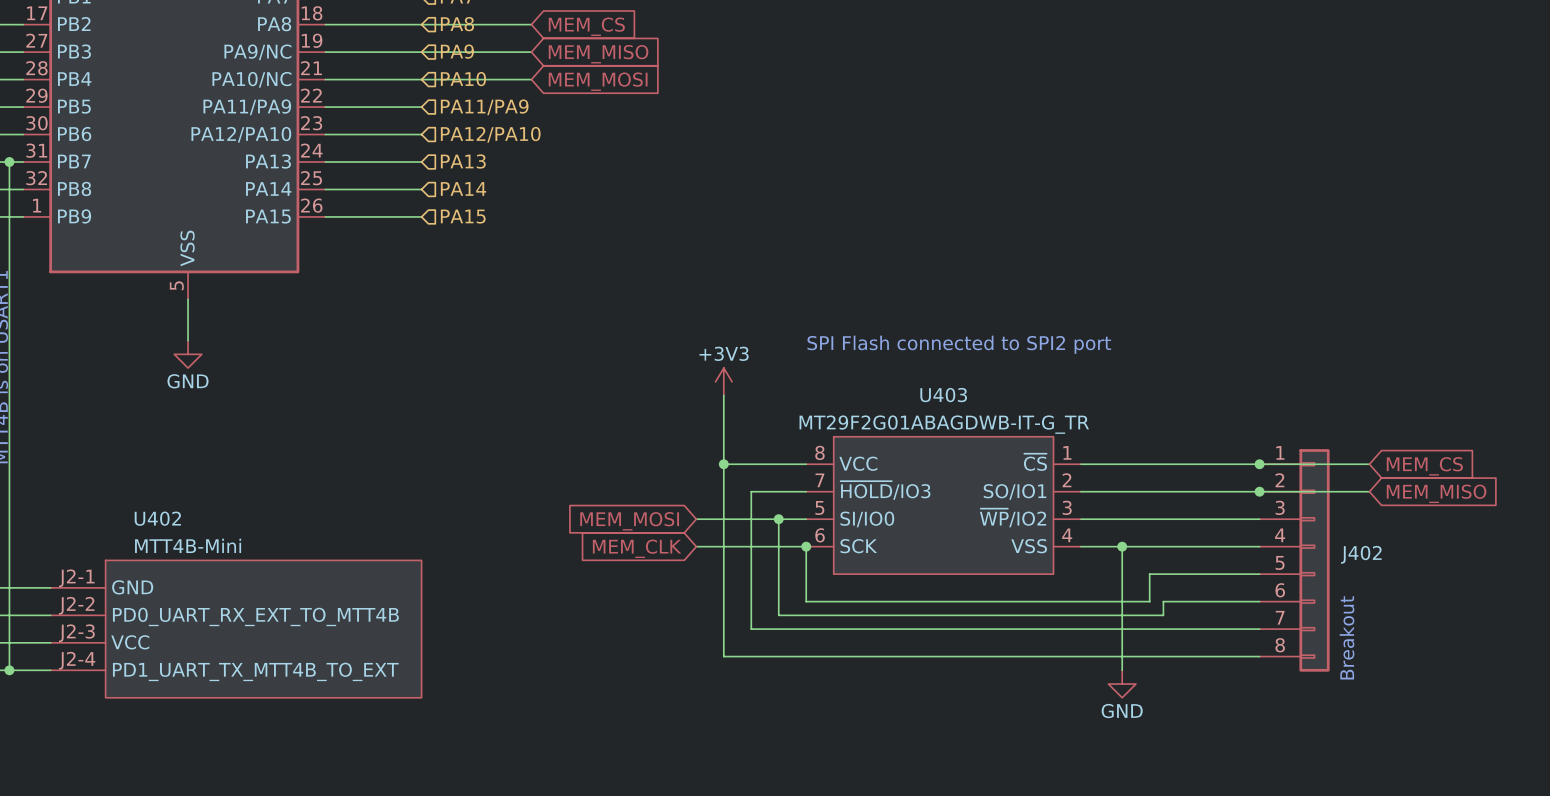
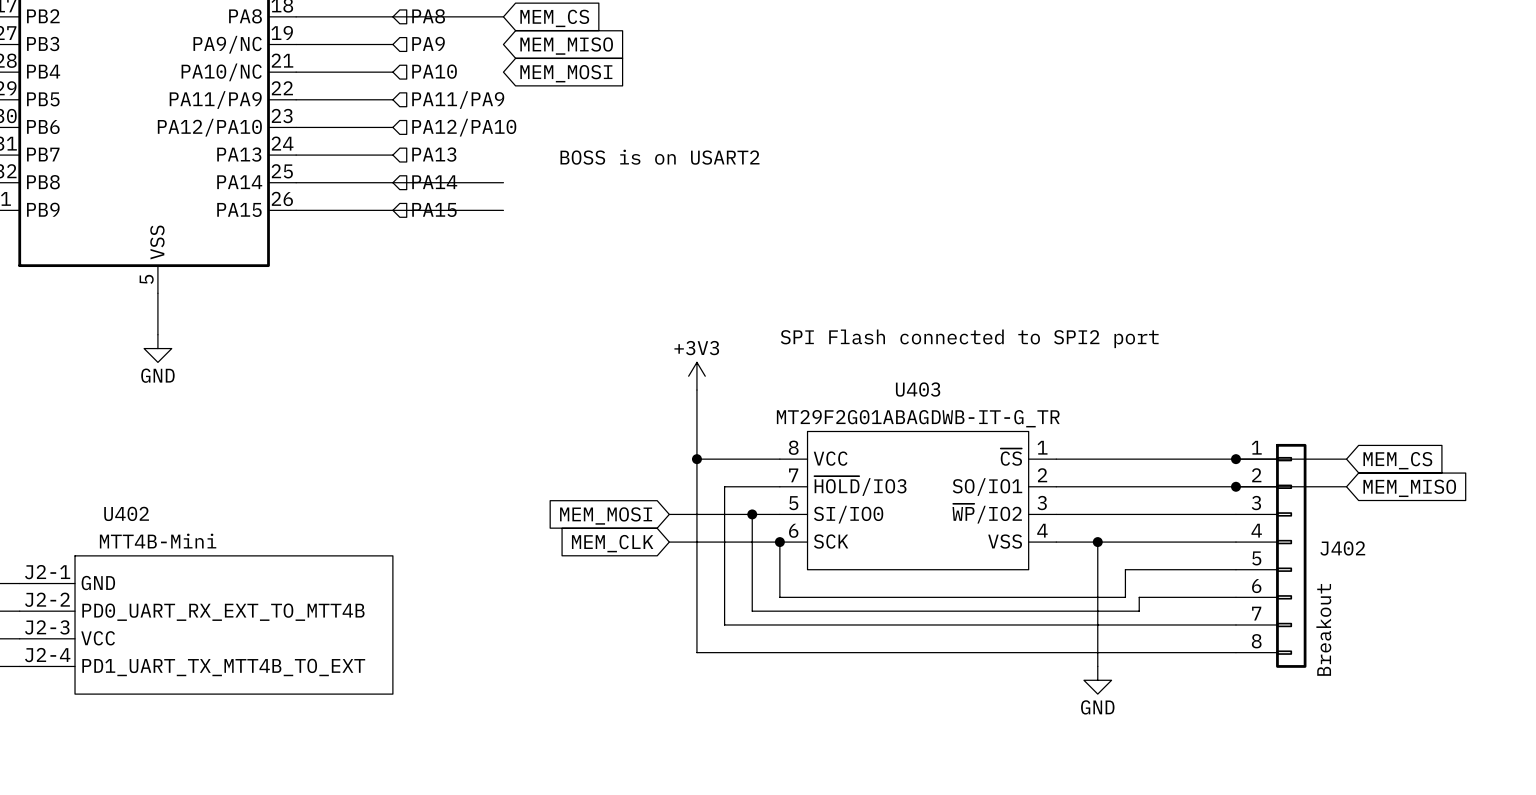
wire: (421, 52) (531, 52) -> (392, 182) (503, 182)
wire: (421, 79) (531, 79) -> (392, 210) (503, 210)
text: none -> BOSS is on USART2 (659, 157)

